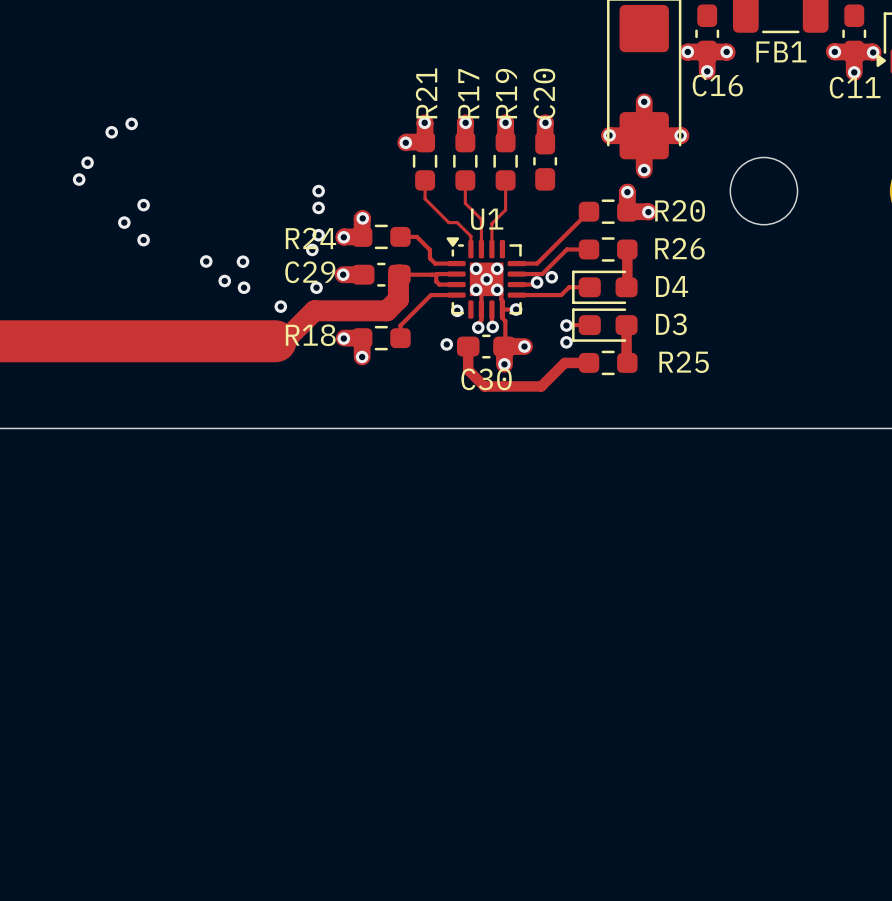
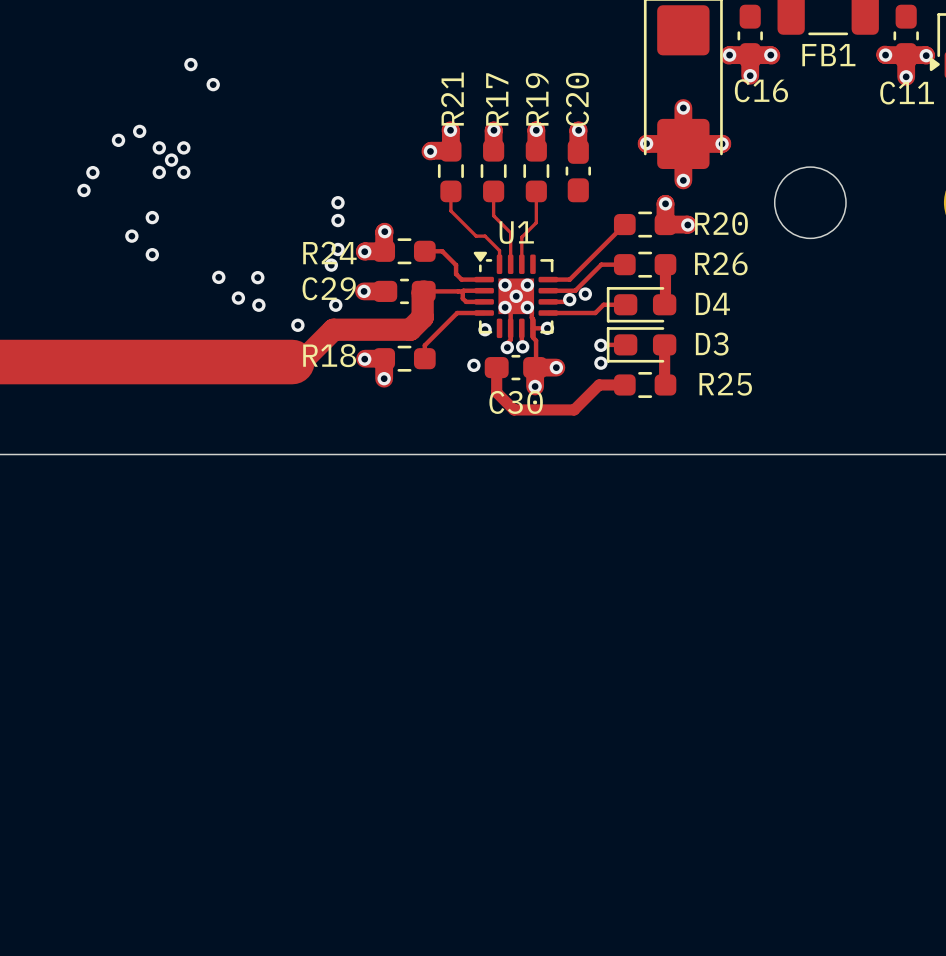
via: none -> (190, 64)
via: none -> (213, 84)
via: none -> (159, 147)
via: none -> (183, 147)
via: none -> (171, 160)
via: none -> (159, 172)
via: none -> (183, 172)

